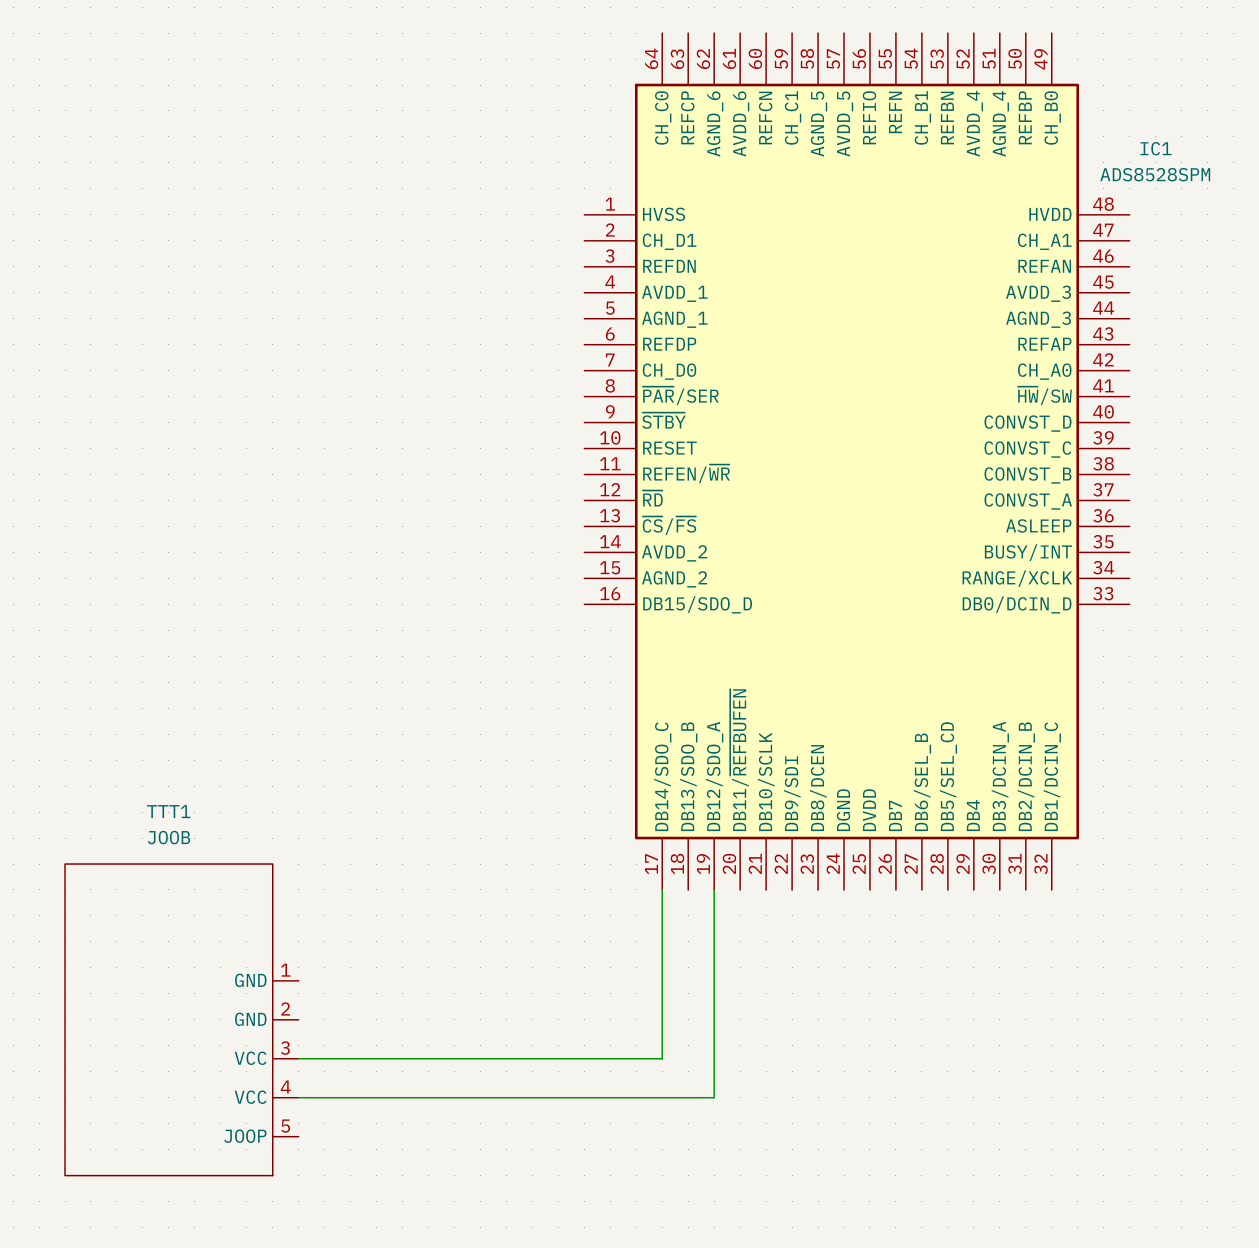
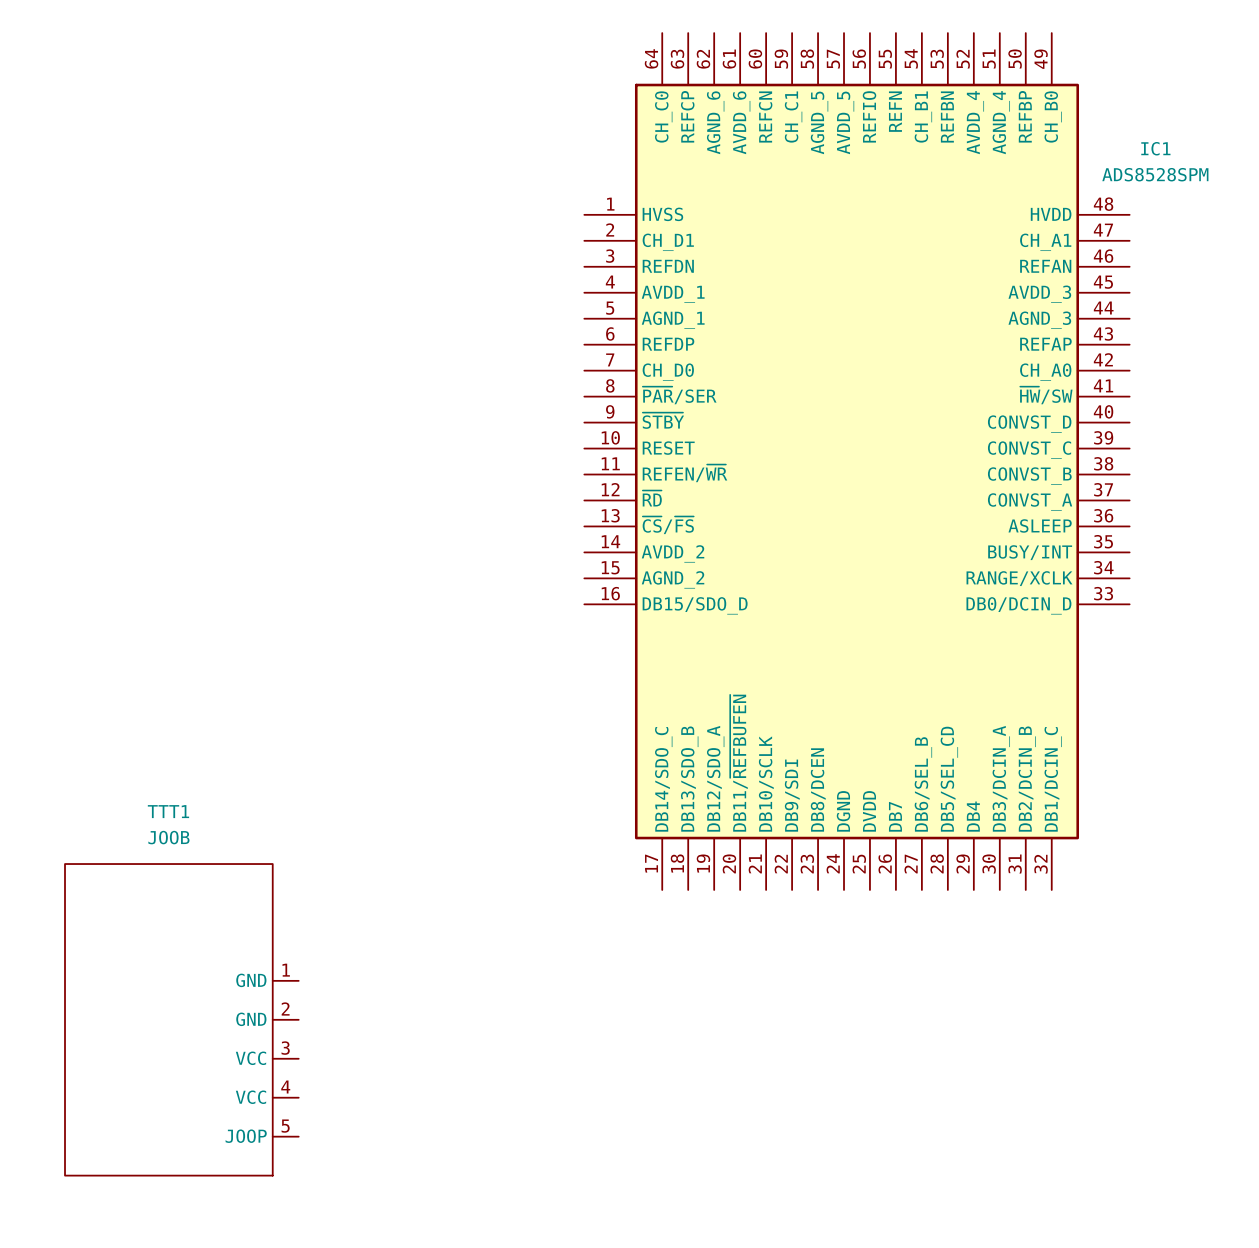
wire: (662, 889) (662, 1058) (298, 1058) -> none
wire: (714, 889) (714, 1097) (298, 1097) -> none

